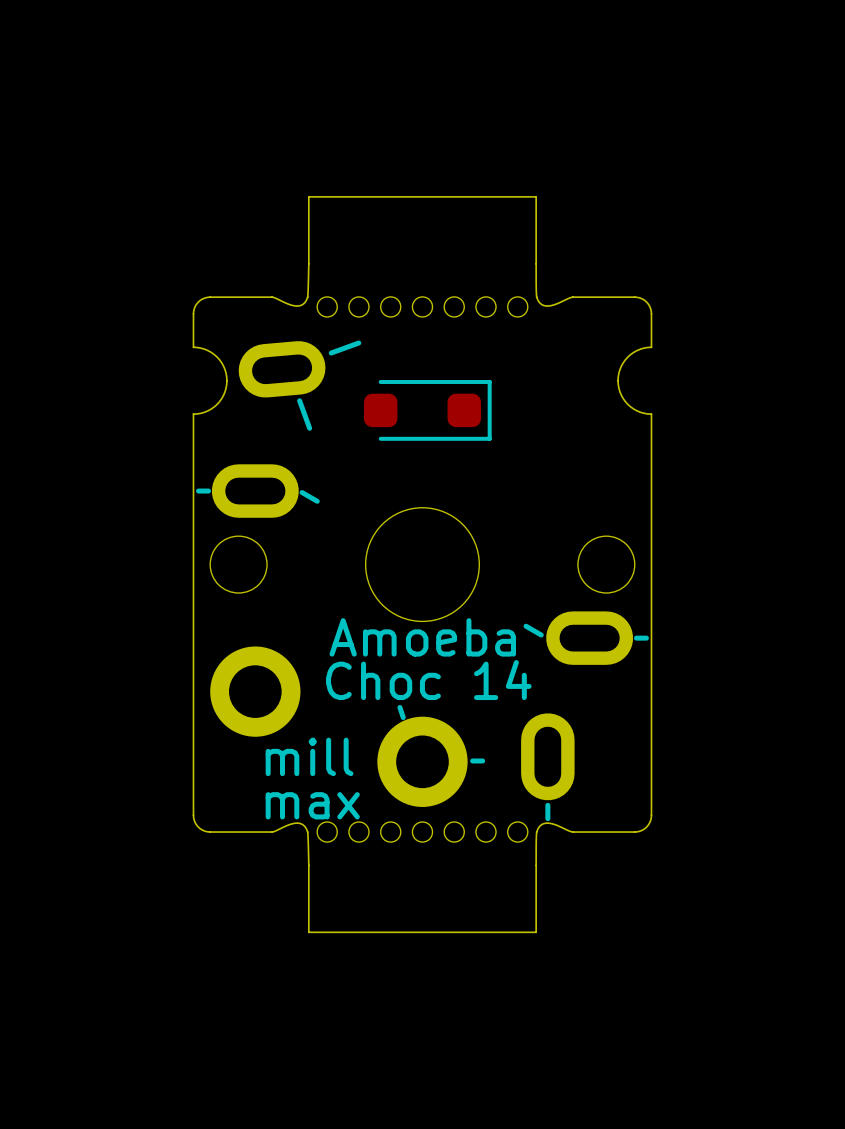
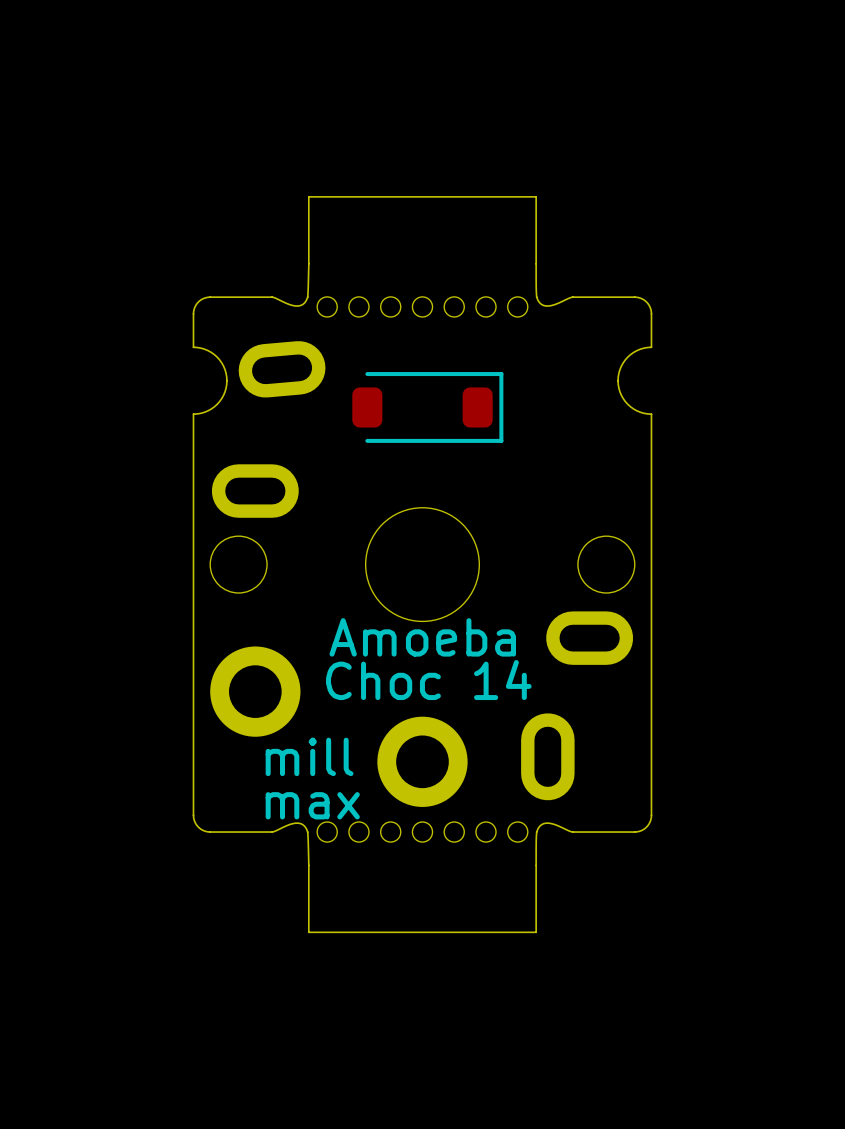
line: (358, 343) (331, 353) -> none
part footprint: [363, 379, 492, 441] -> [352, 372, 504, 443]
line: (299, 400) (309, 428) -> none
line: (198, 491) (208, 491) -> none
line: (302, 492) (317, 501) -> none
line: (526, 626) (541, 635) -> none
line: (636, 638) (646, 638) -> none
line: (399, 707) (403, 717) -> none
line: (472, 760) (482, 760) -> none
line: (547, 805) (547, 818) -> none

